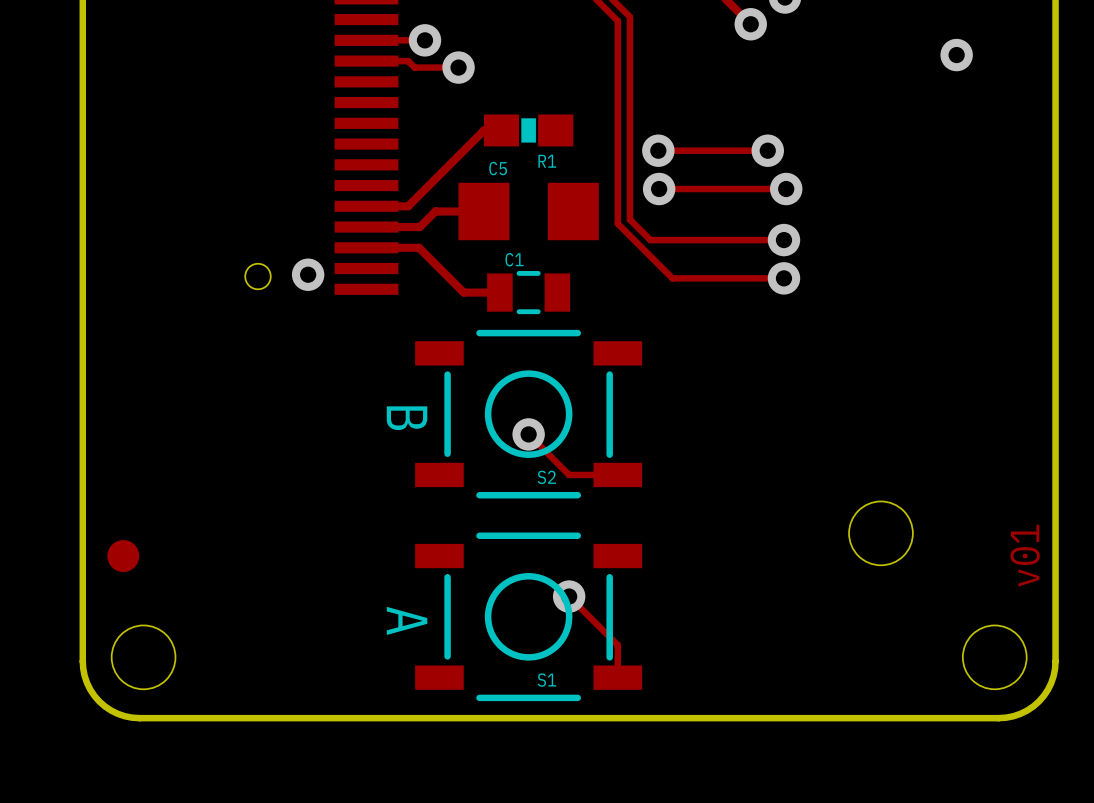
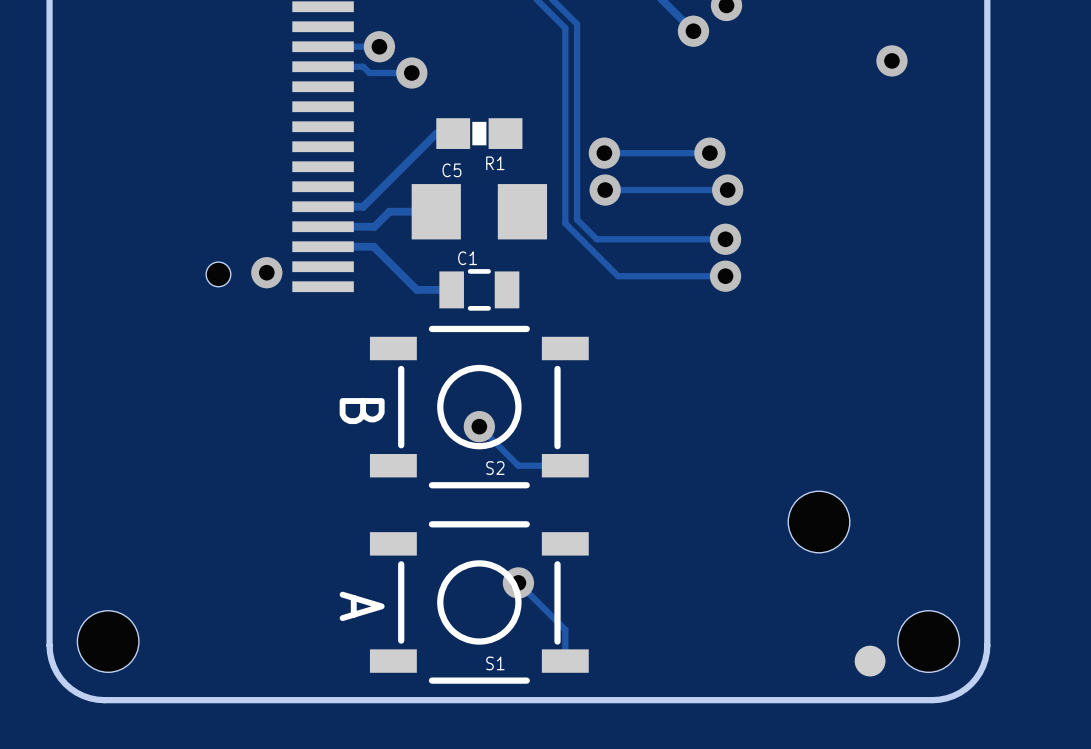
text: v01 (1025, 555) -> none
part: (123, 556) -> none
part: none -> (870, 661)

